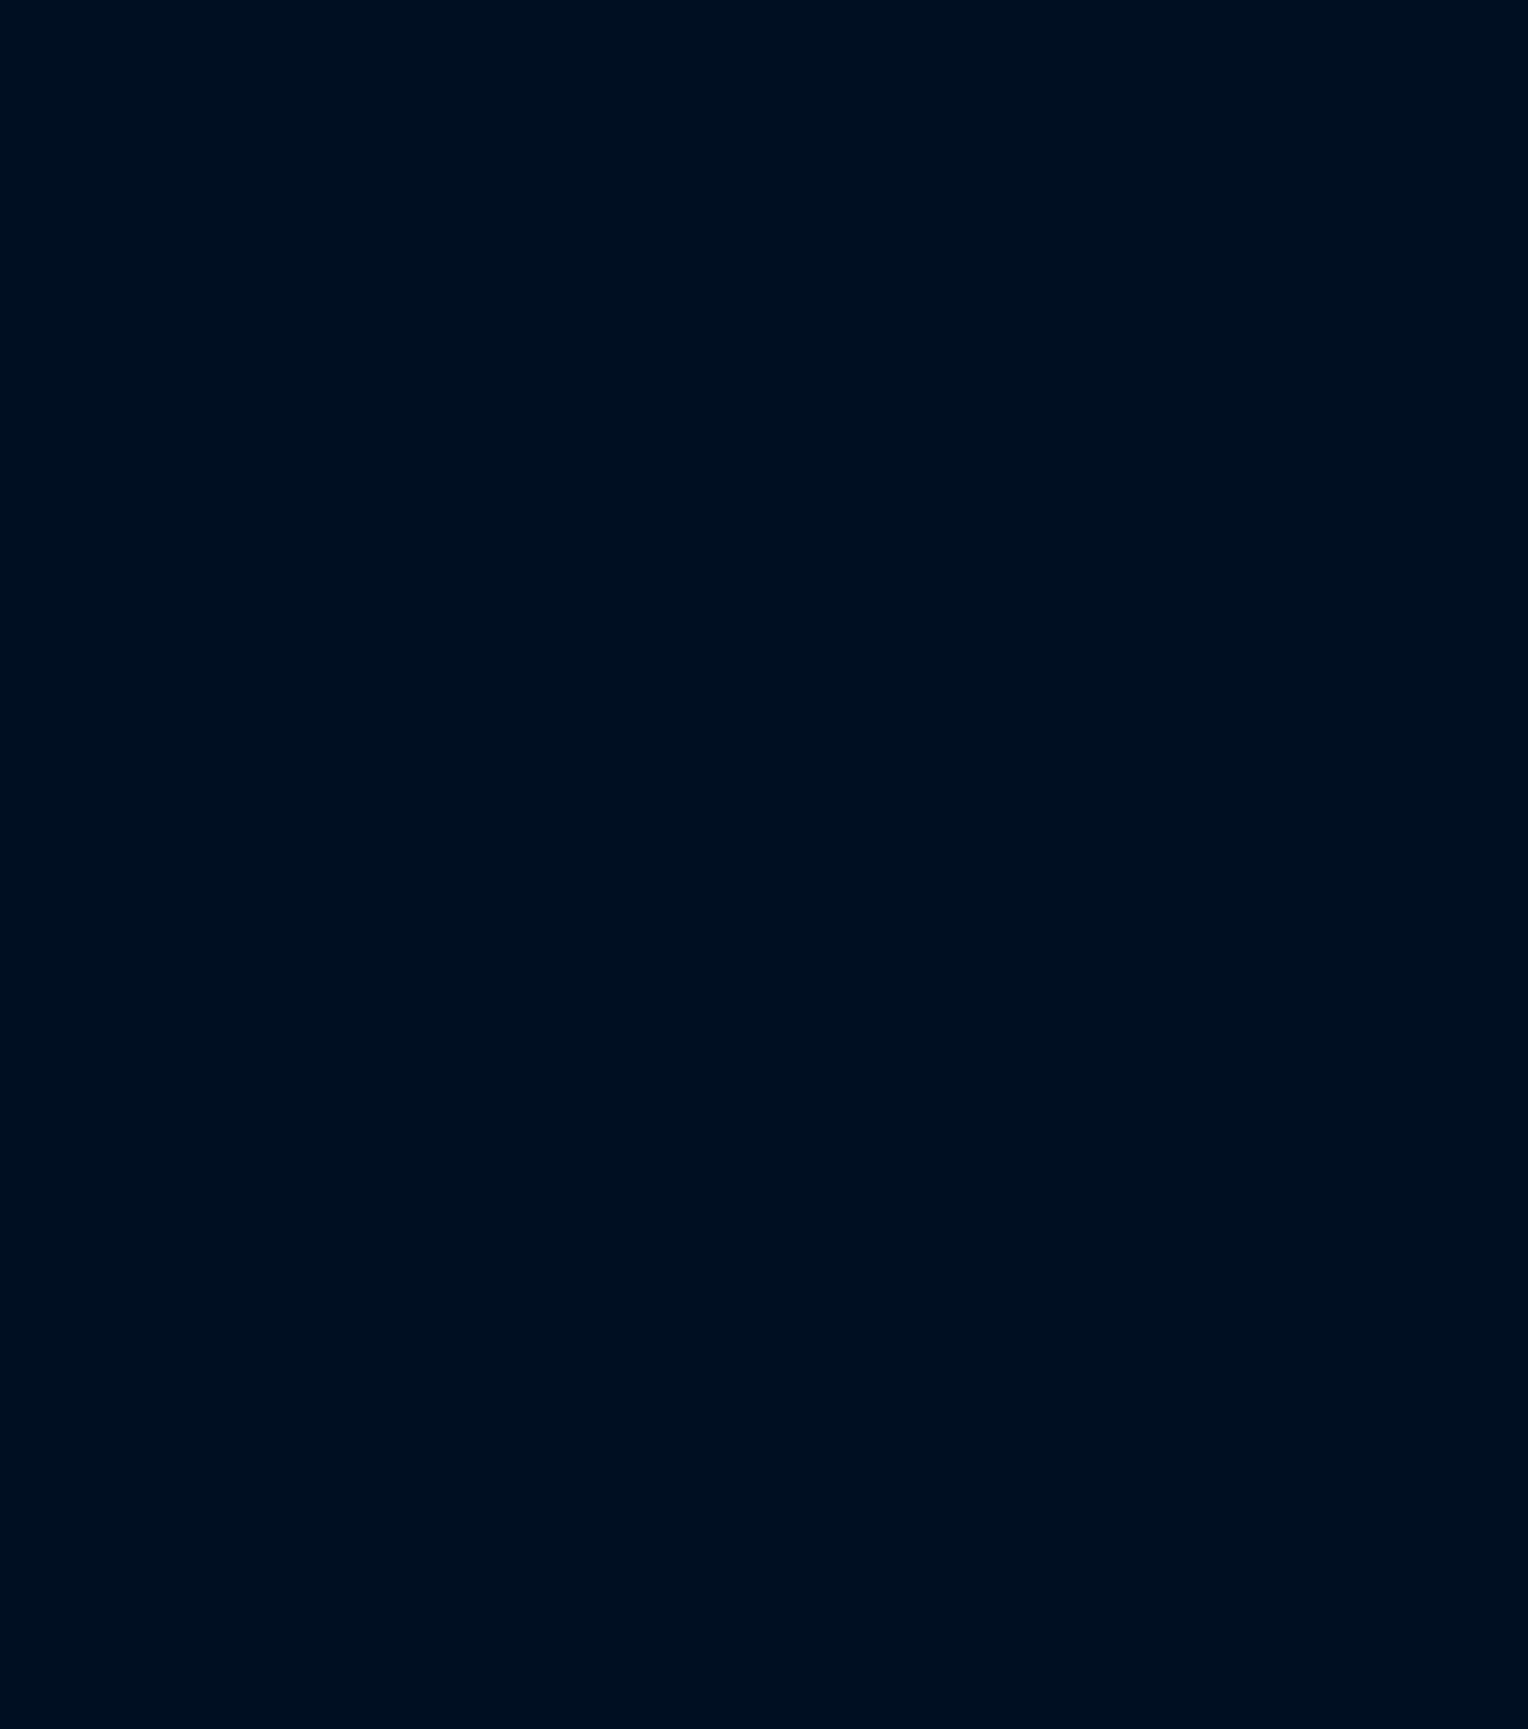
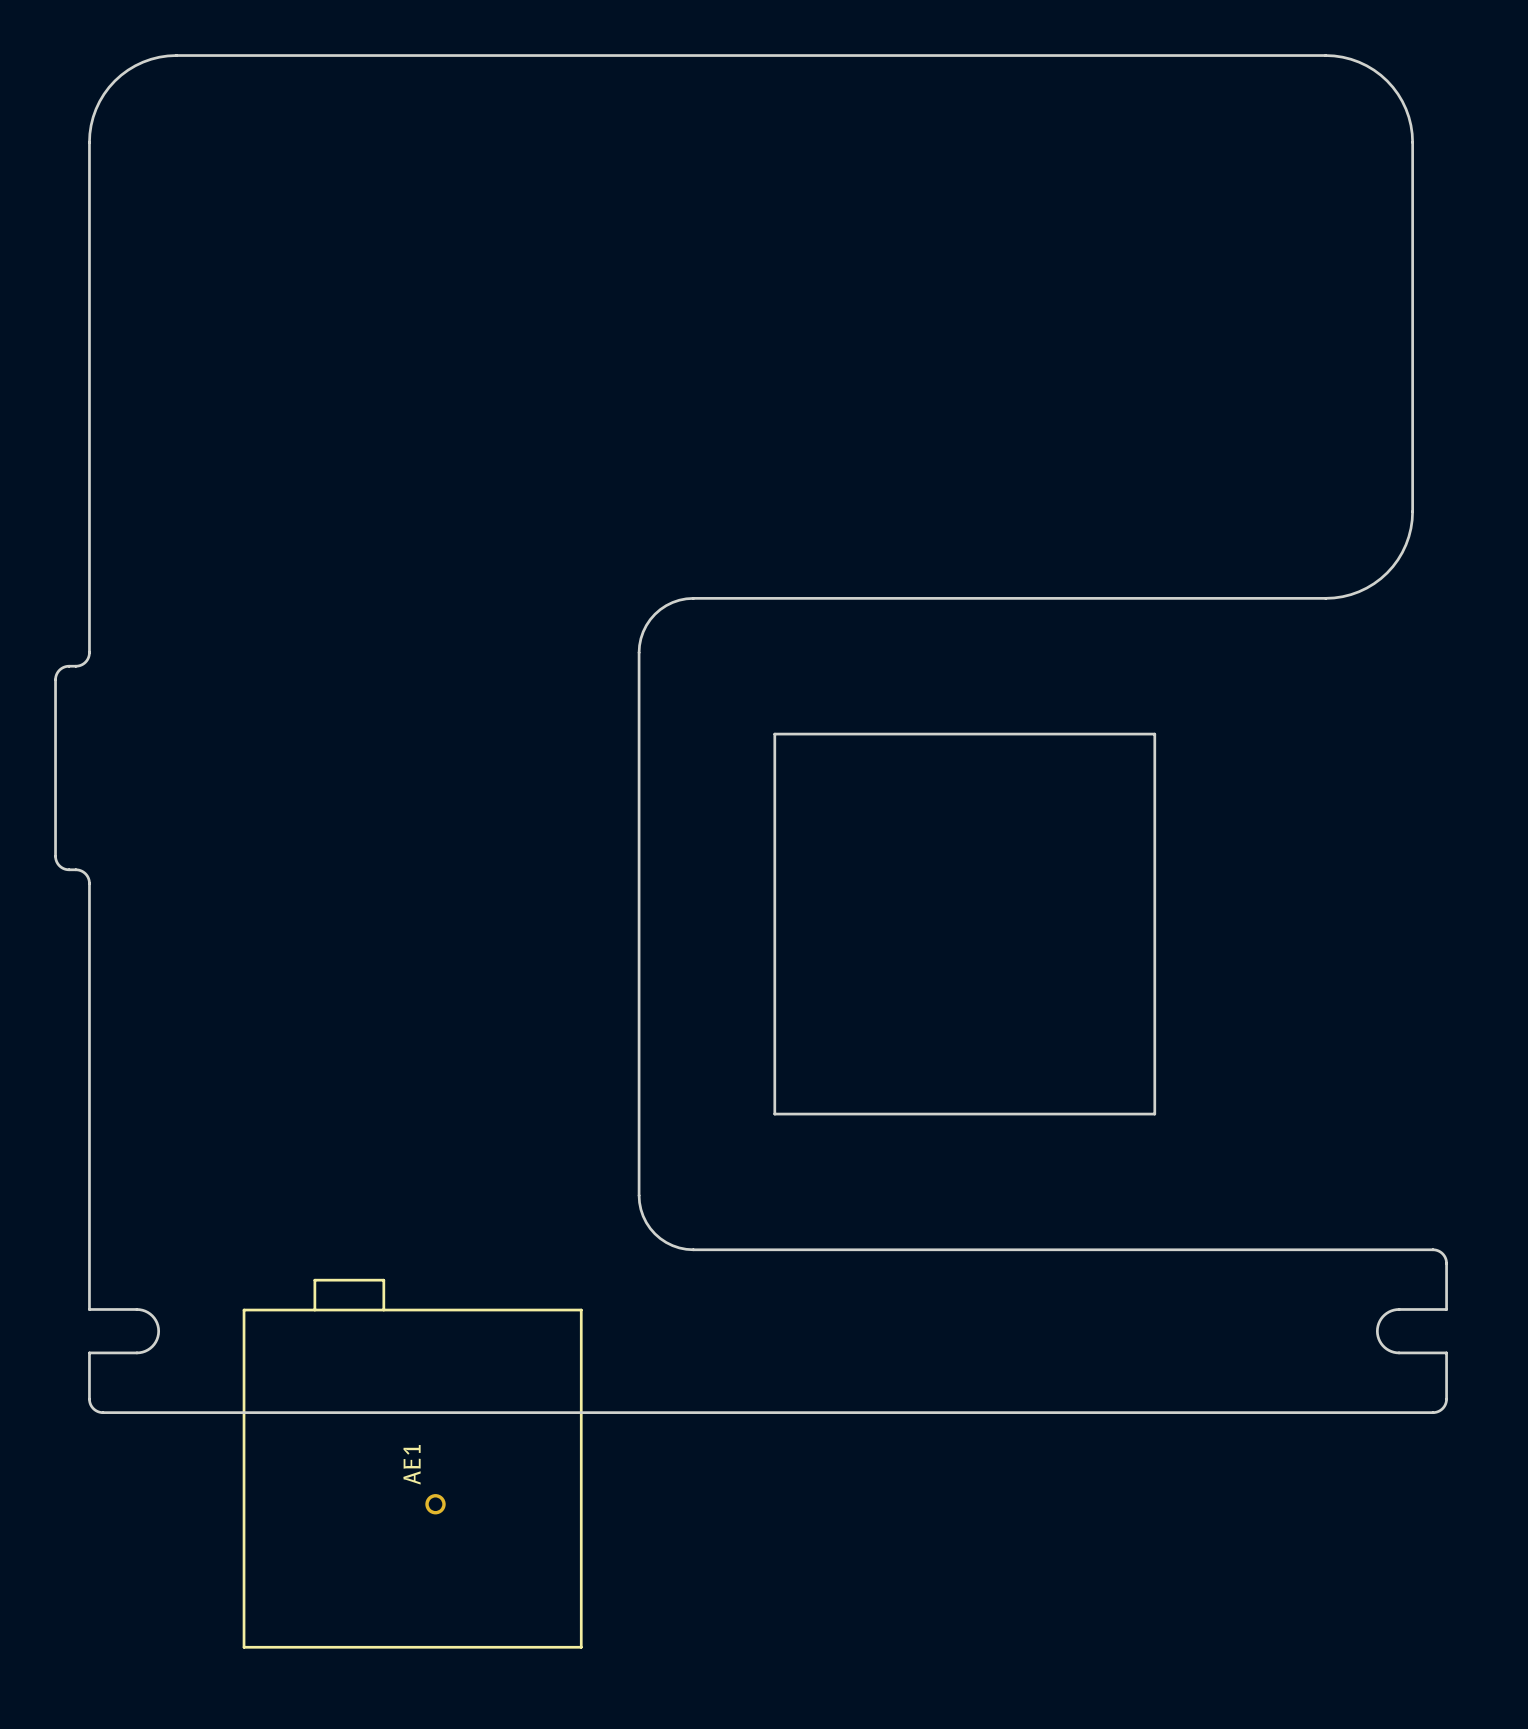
board edge: none -> (176, 55) (1325, 55) (1342, 57) (1359, 62) (1374, 70) (1387, 80) (1402, 101) (1408, 117) (1412, 133) (1412, 511) (1410, 528) (1402, 552) (1387, 572) (1374, 583) (1350, 594) (1325, 598) (693, 598) (679, 600) (666, 605) (650, 619) (640, 638) (639, 652) (639, 1195) (643, 1216) (654, 1233) (666, 1242) (686, 1249) (1436, 1250) (1442, 1253) (1446, 1260) (1446, 1309) (1391, 1310) (1381, 1318) (1377, 1331) (1381, 1343) (1391, 1351) (1446, 1352) (1446, 1400) (1442, 1408) (1432, 1412) (103, 1412) (93, 1408) (89, 1400) (89, 1352) (142, 1352) (154, 1344) (158, 1331) (154, 1317) (142, 1310) (89, 1309) (89, 883) (84, 872) (63, 868) (58, 864) (55, 857) (55, 678) (60, 669) (81, 664) (86, 661) (89, 654) (89, 142) (91, 125) (99, 101) (109, 87) (121, 75) (143, 62) (159, 57) (176, 55)
board edge: none -> (774, 734) (1154, 734) (1154, 1114) (774, 1114) (774, 734)
AE1: none -> (412, 1463)

